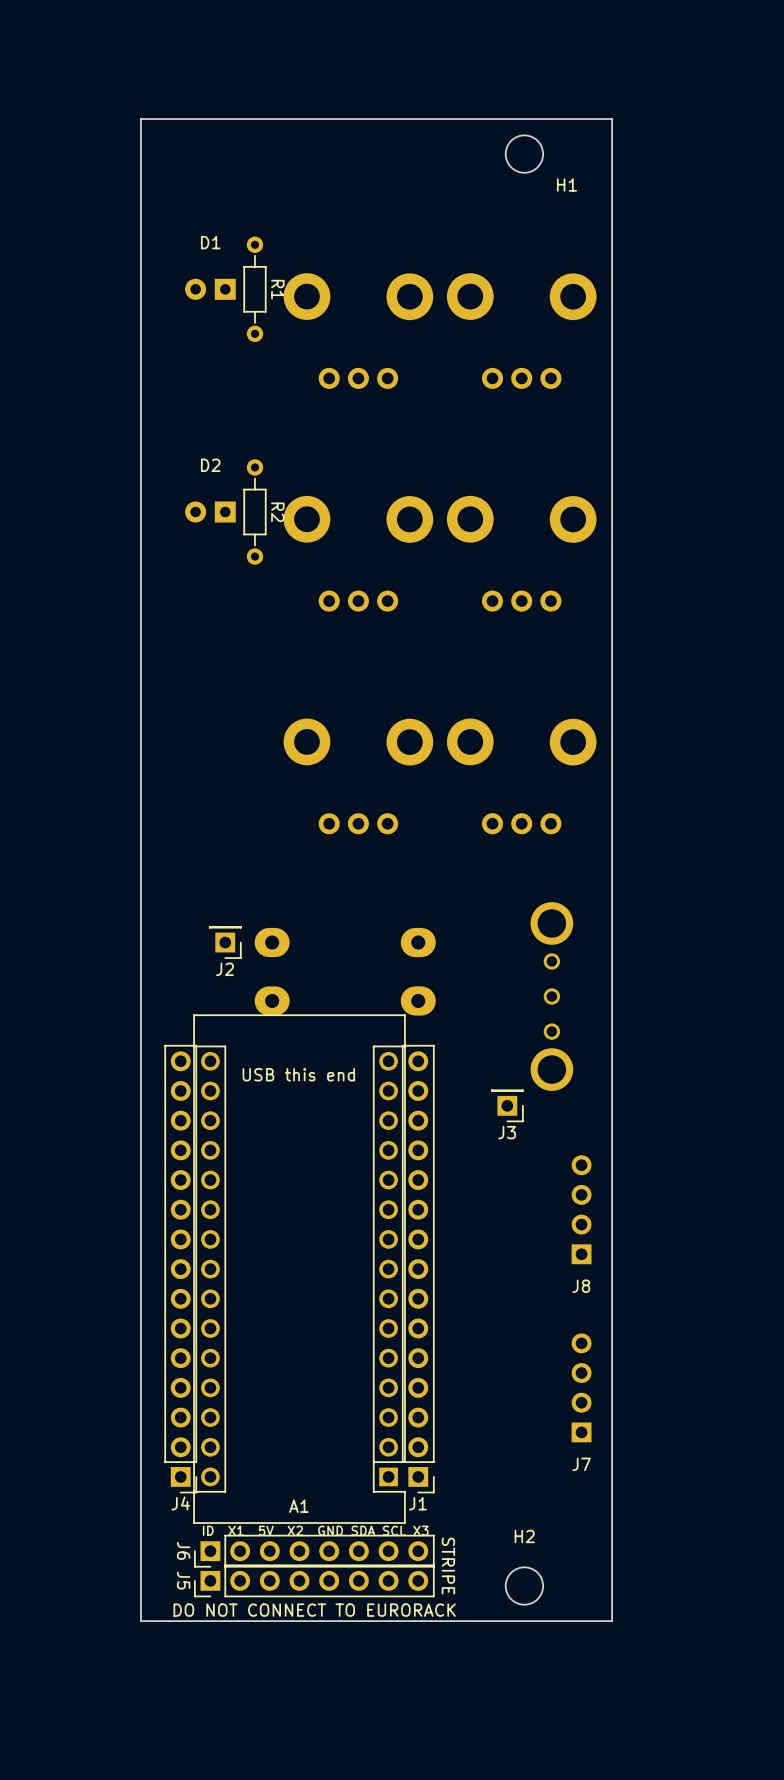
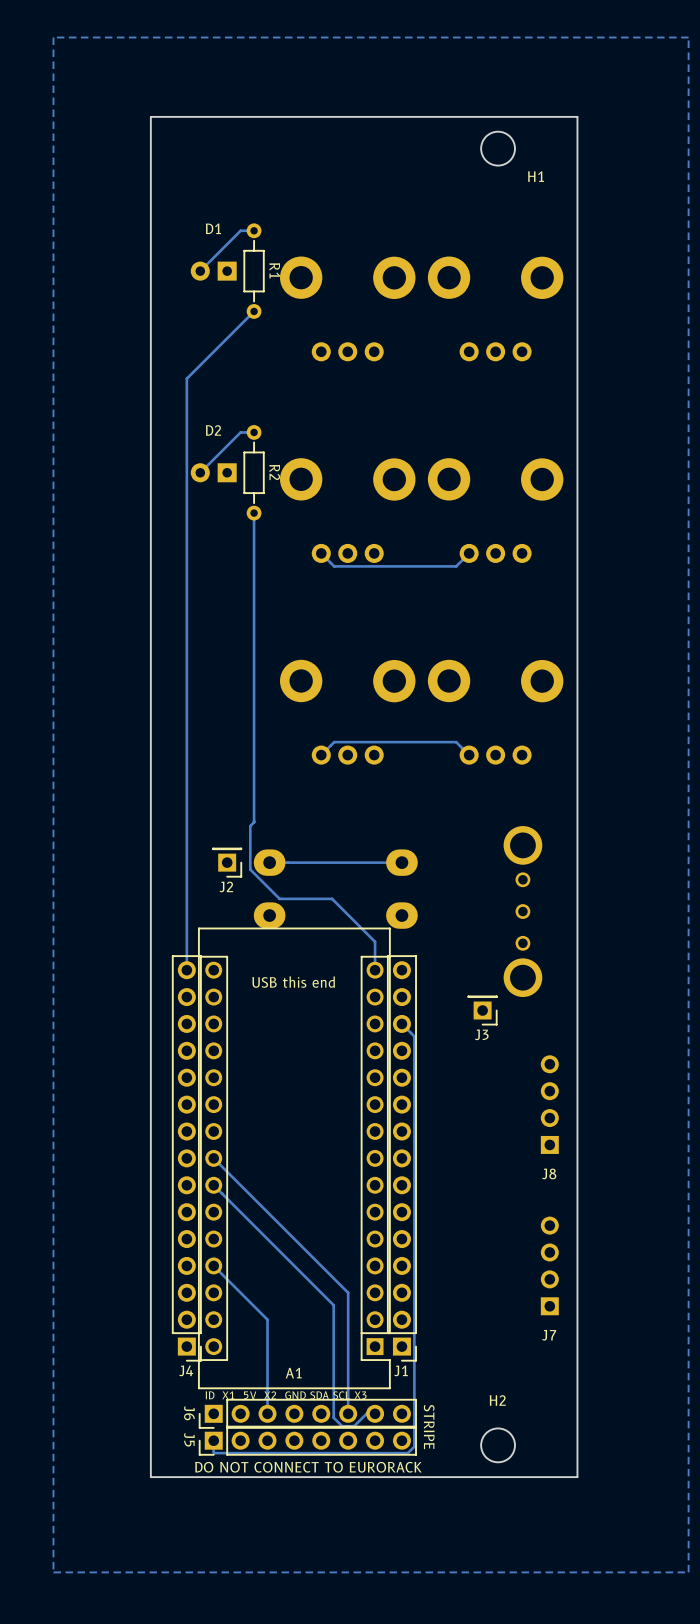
zone outline: none -> (688, 37) (688, 1572) (53, 1572) (53, 37) (688, 37)
track: none -> (254, 230) (240, 230) (200, 271)
track: none -> (254, 311) (186, 378) (186, 970)
track: none -> (254, 432) (240, 432) (200, 472)
track: none -> (254, 513) (254, 822) (250, 826) (250, 869) (279, 898) (332, 898) (375, 941) (375, 970)
track: none -> (469, 553) (456, 566) (334, 566) (321, 553)
track: none -> (469, 755) (456, 742) (334, 742) (321, 755)
track: none -> (401, 862) (269, 862)
track: none -> (401, 1023) (414, 1036) (414, 1446) (407, 1453) (214, 1453) (213, 1440)
track: none -> (213, 1158) (348, 1292) (348, 1413)
track: none -> (213, 1185) (333, 1305) (333, 1417) (342, 1426) (354, 1426) (366, 1413) (375, 1413)
track: none -> (213, 1265) (267, 1319) (267, 1413)

